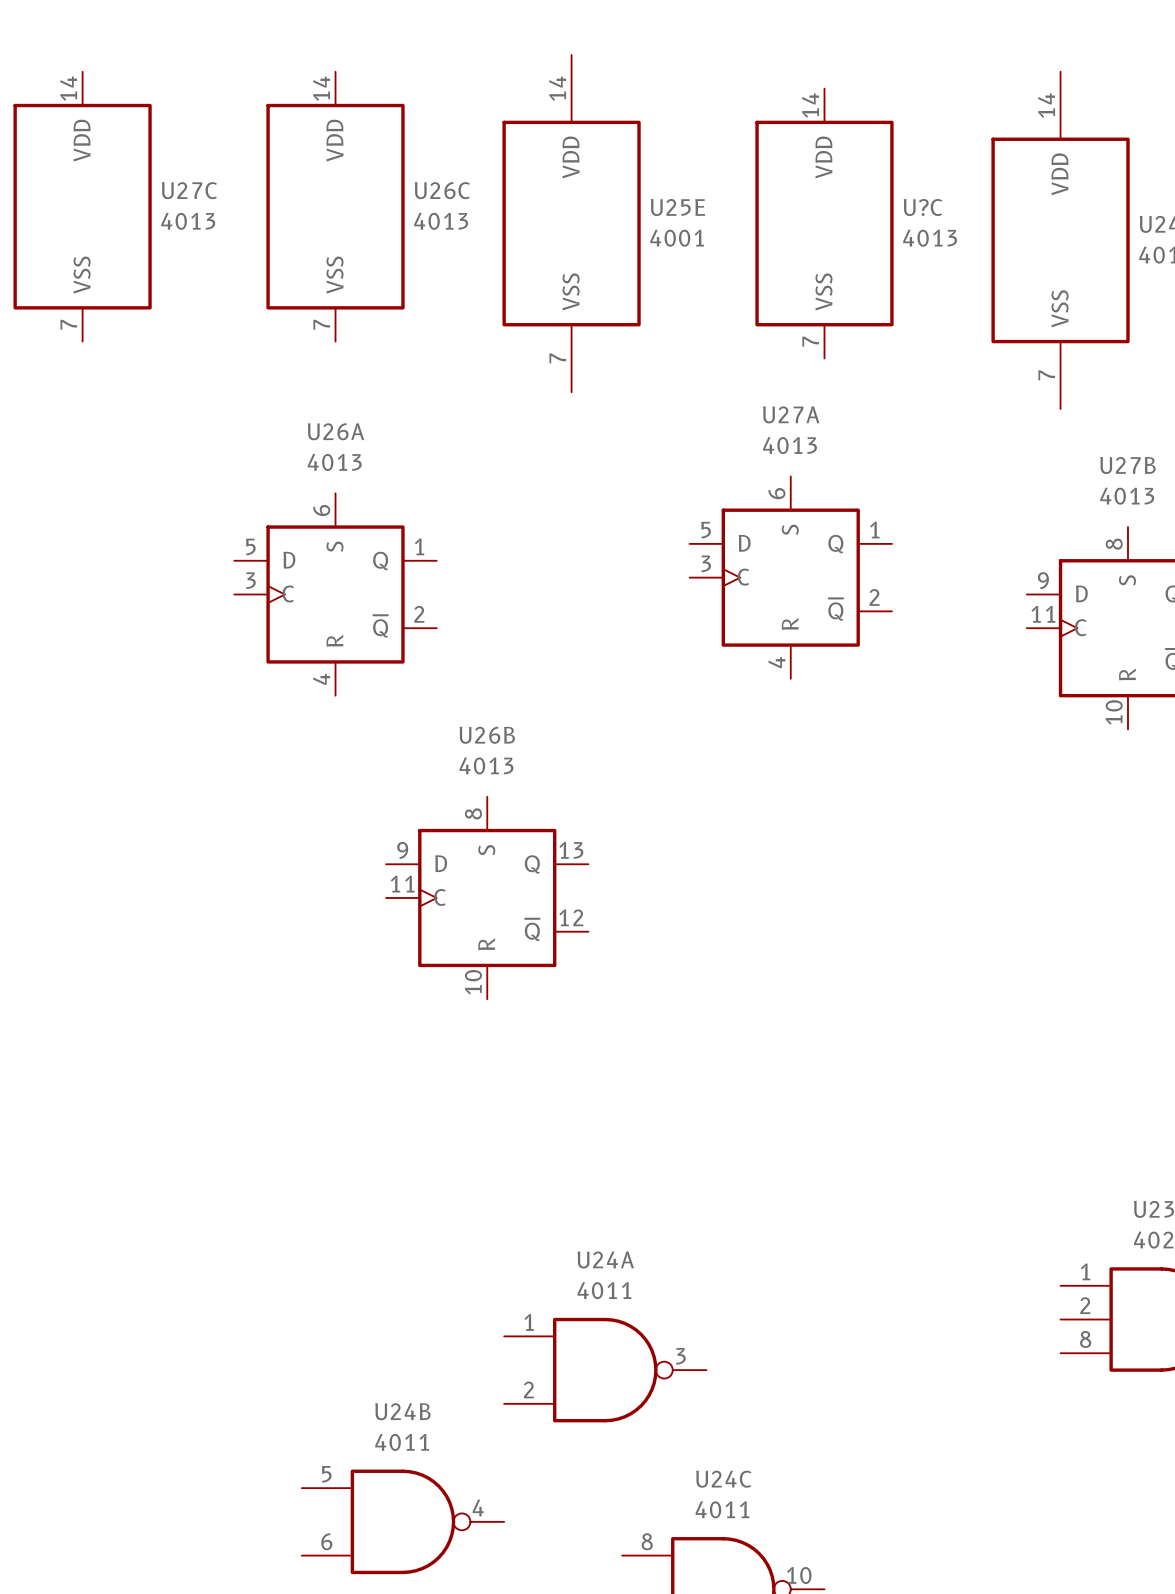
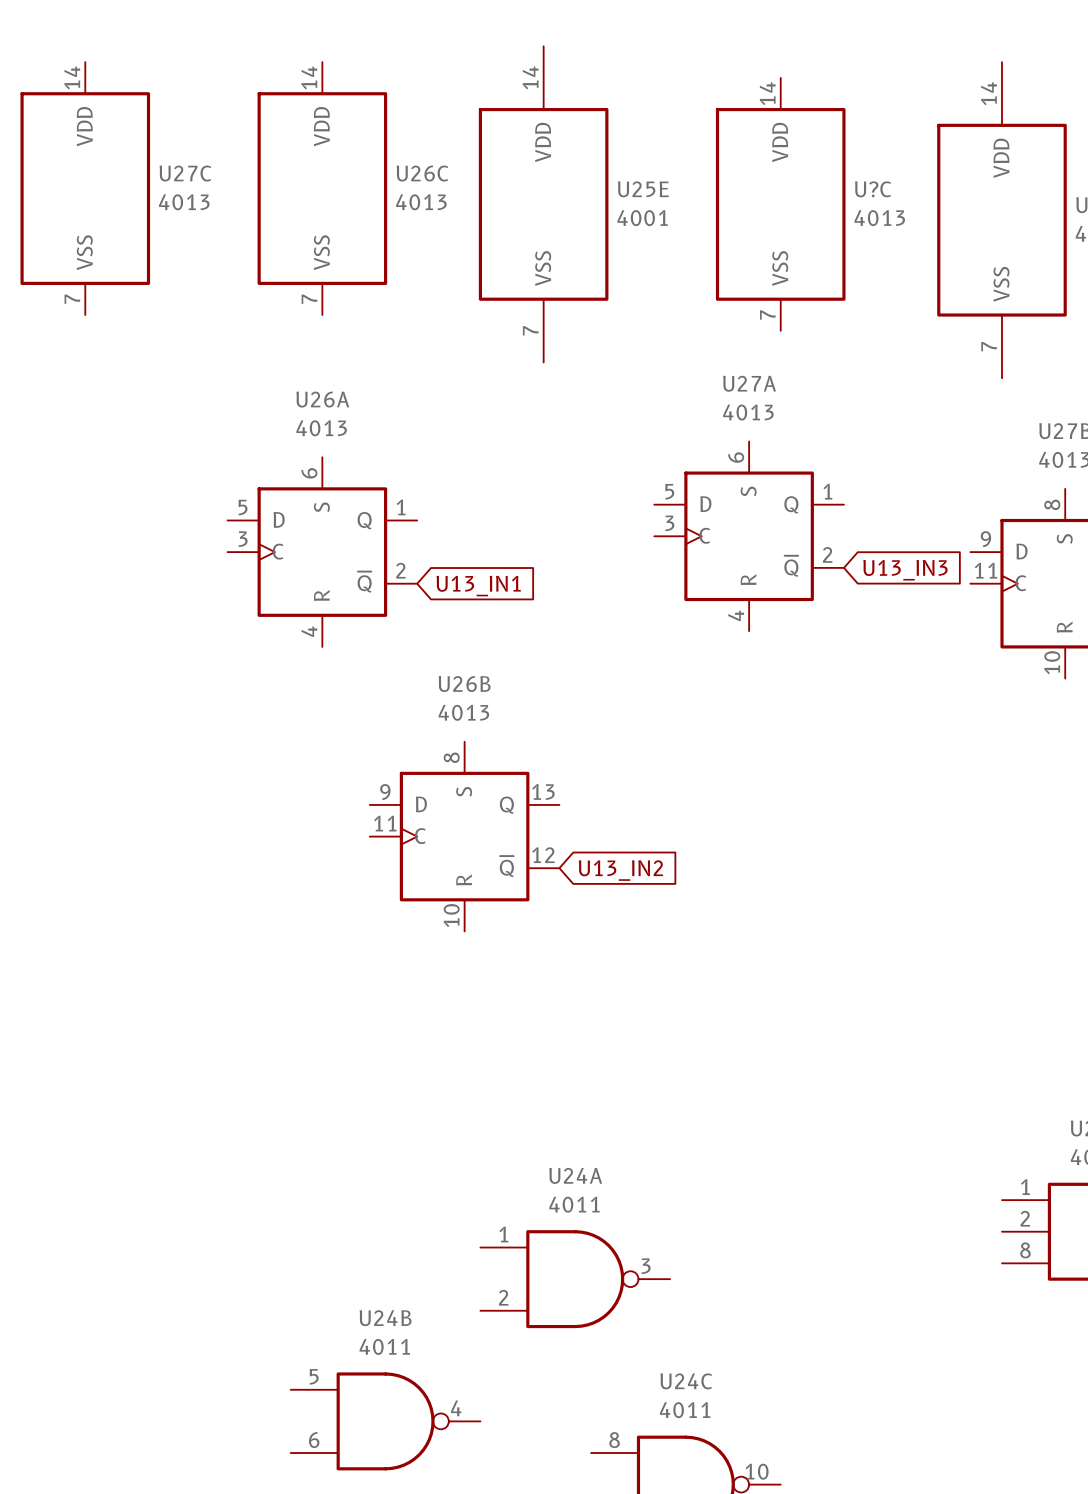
global label: none -> U13_IN3 (905, 570)
global label: none -> U13_IN1 (478, 586)
global label: none -> U13_IN2 (620, 870)

